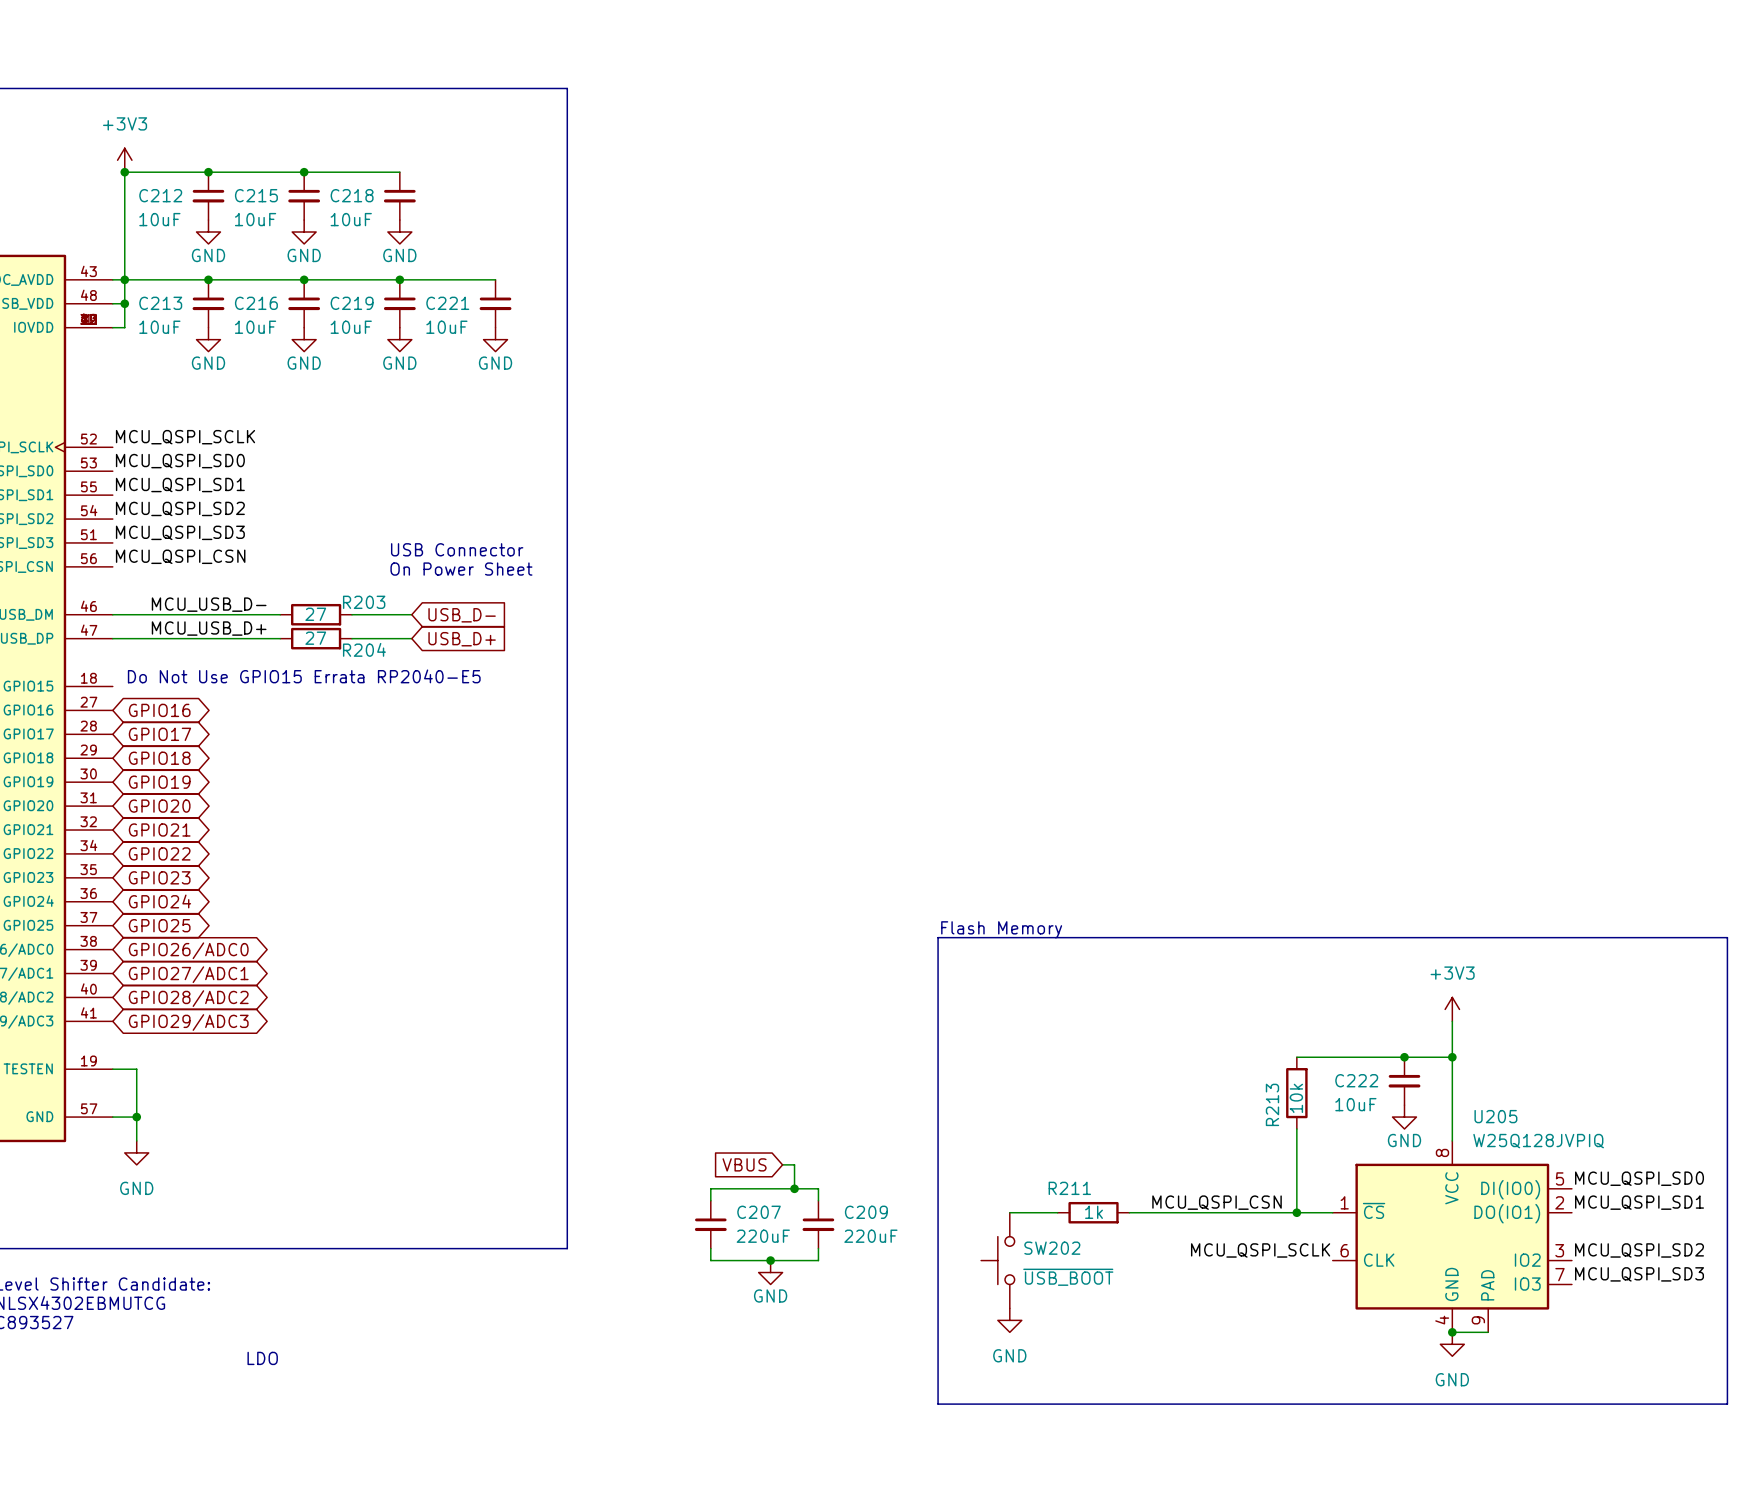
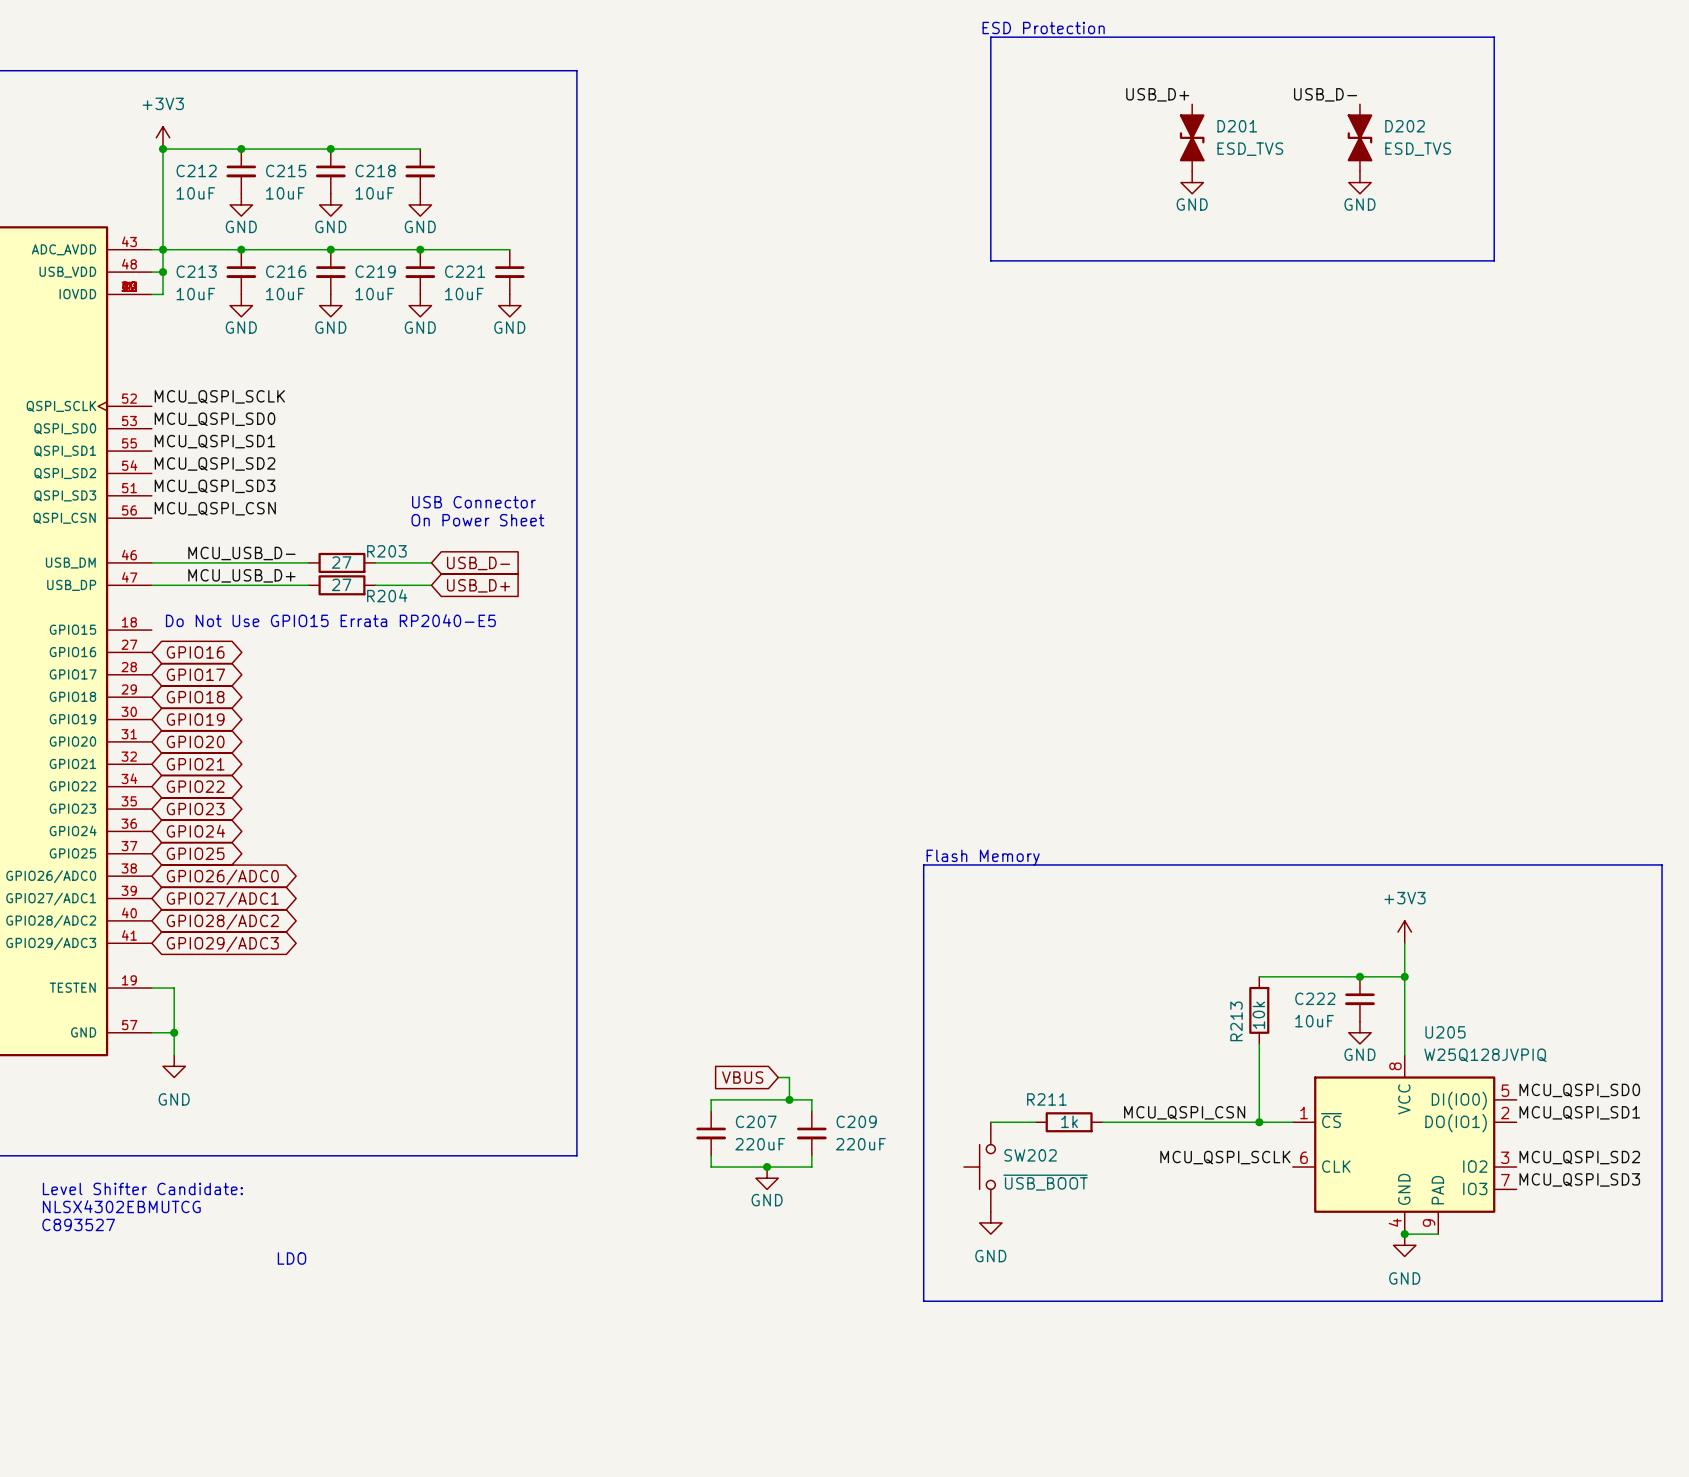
text: none -> ESD Protection (1043, 27)
line: none -> (990, 37) (990, 260) (1494, 260) (1494, 37) (990, 37)
label: none -> USB_D+ (1157, 94)
label: none -> USB_D- (1325, 94)
D201: none -> ESD_TVS (1192, 137)
D202: none -> ESD_TVS (1359, 137)
power symbol: none -> GND (1192, 182)
power symbol: none -> GND (1359, 182)

